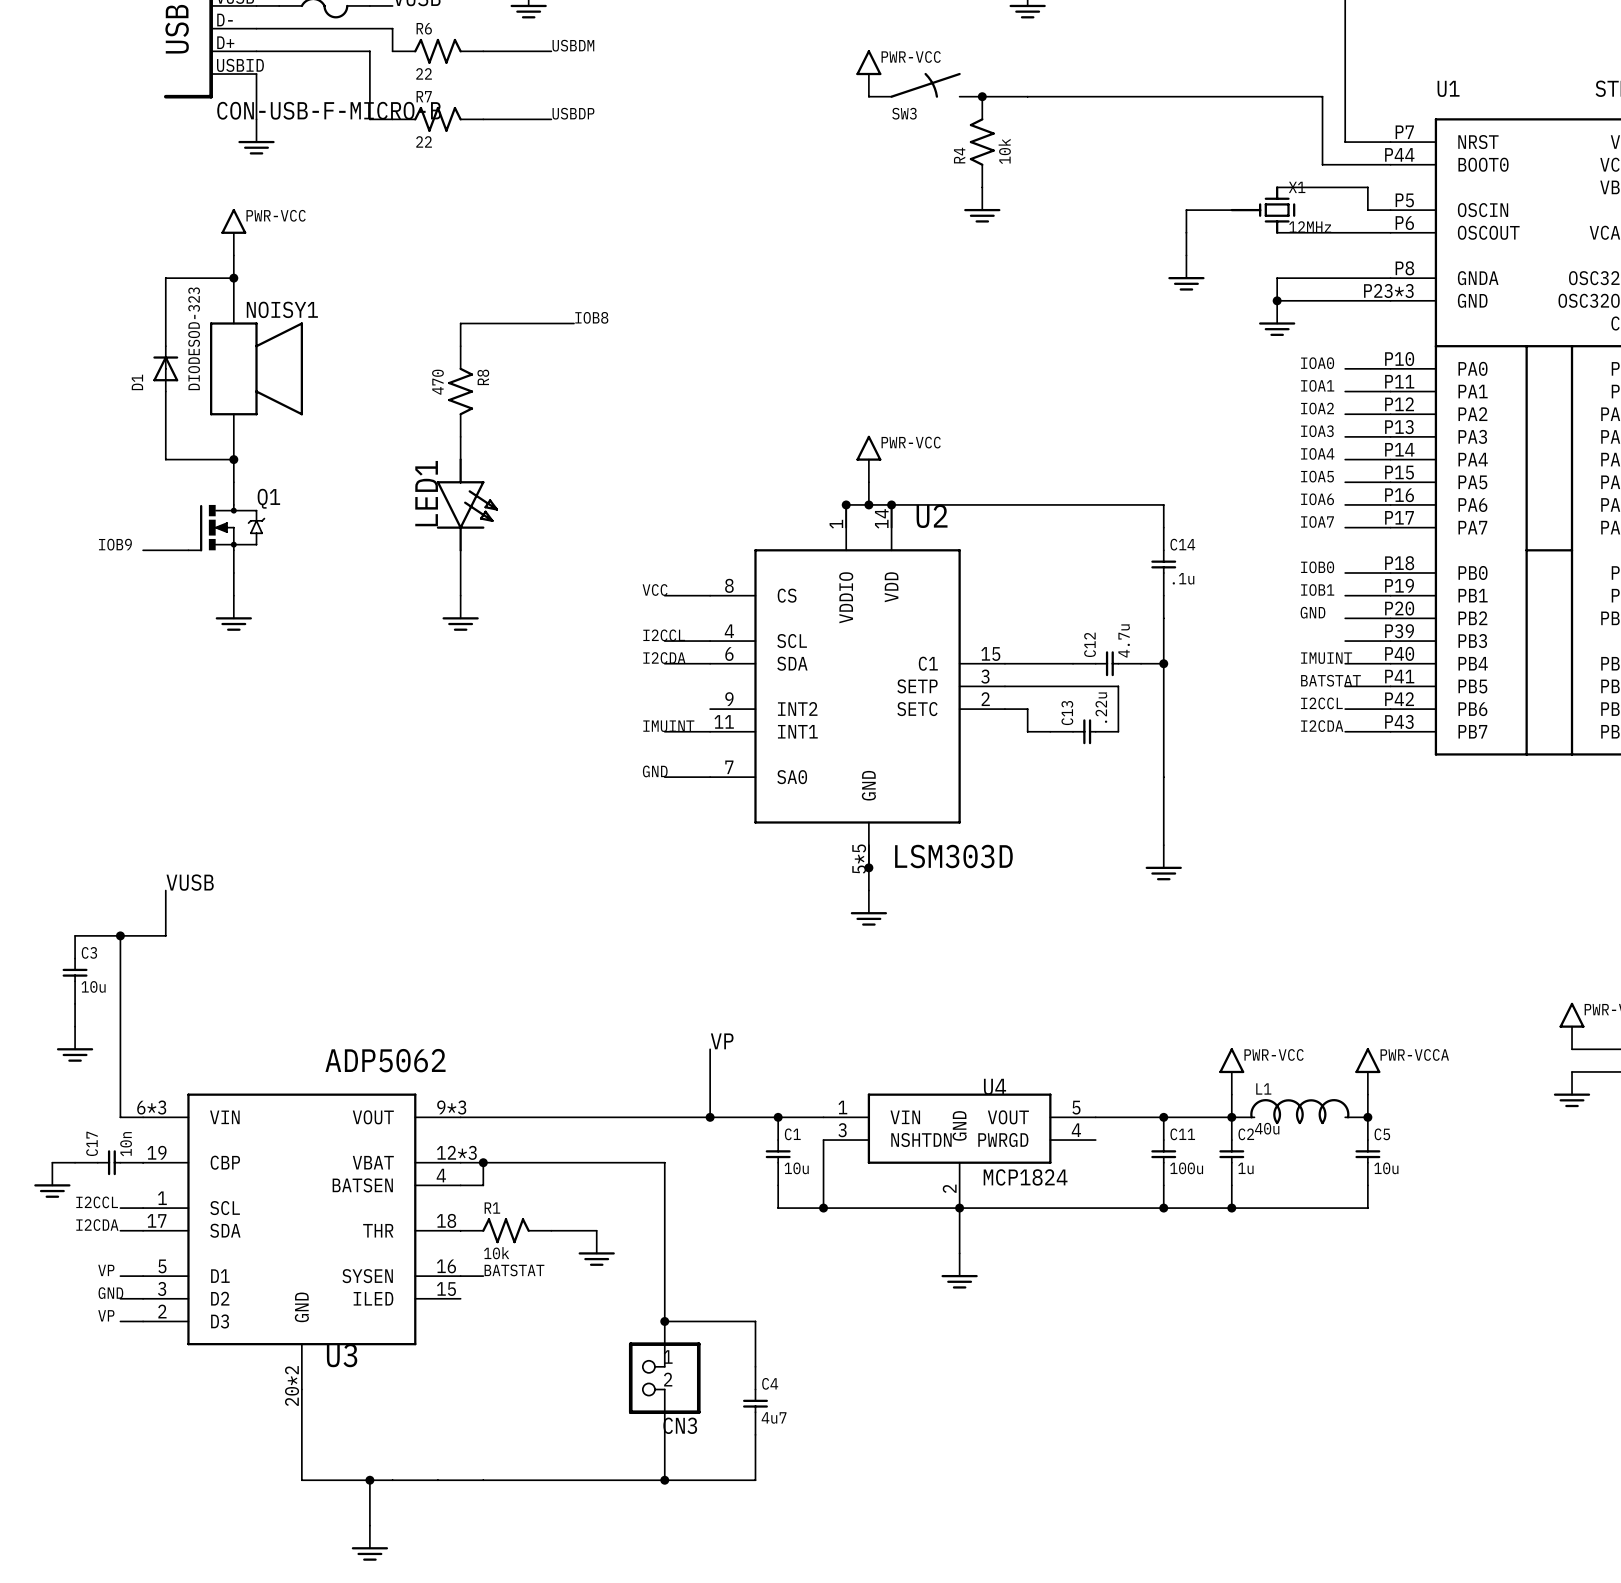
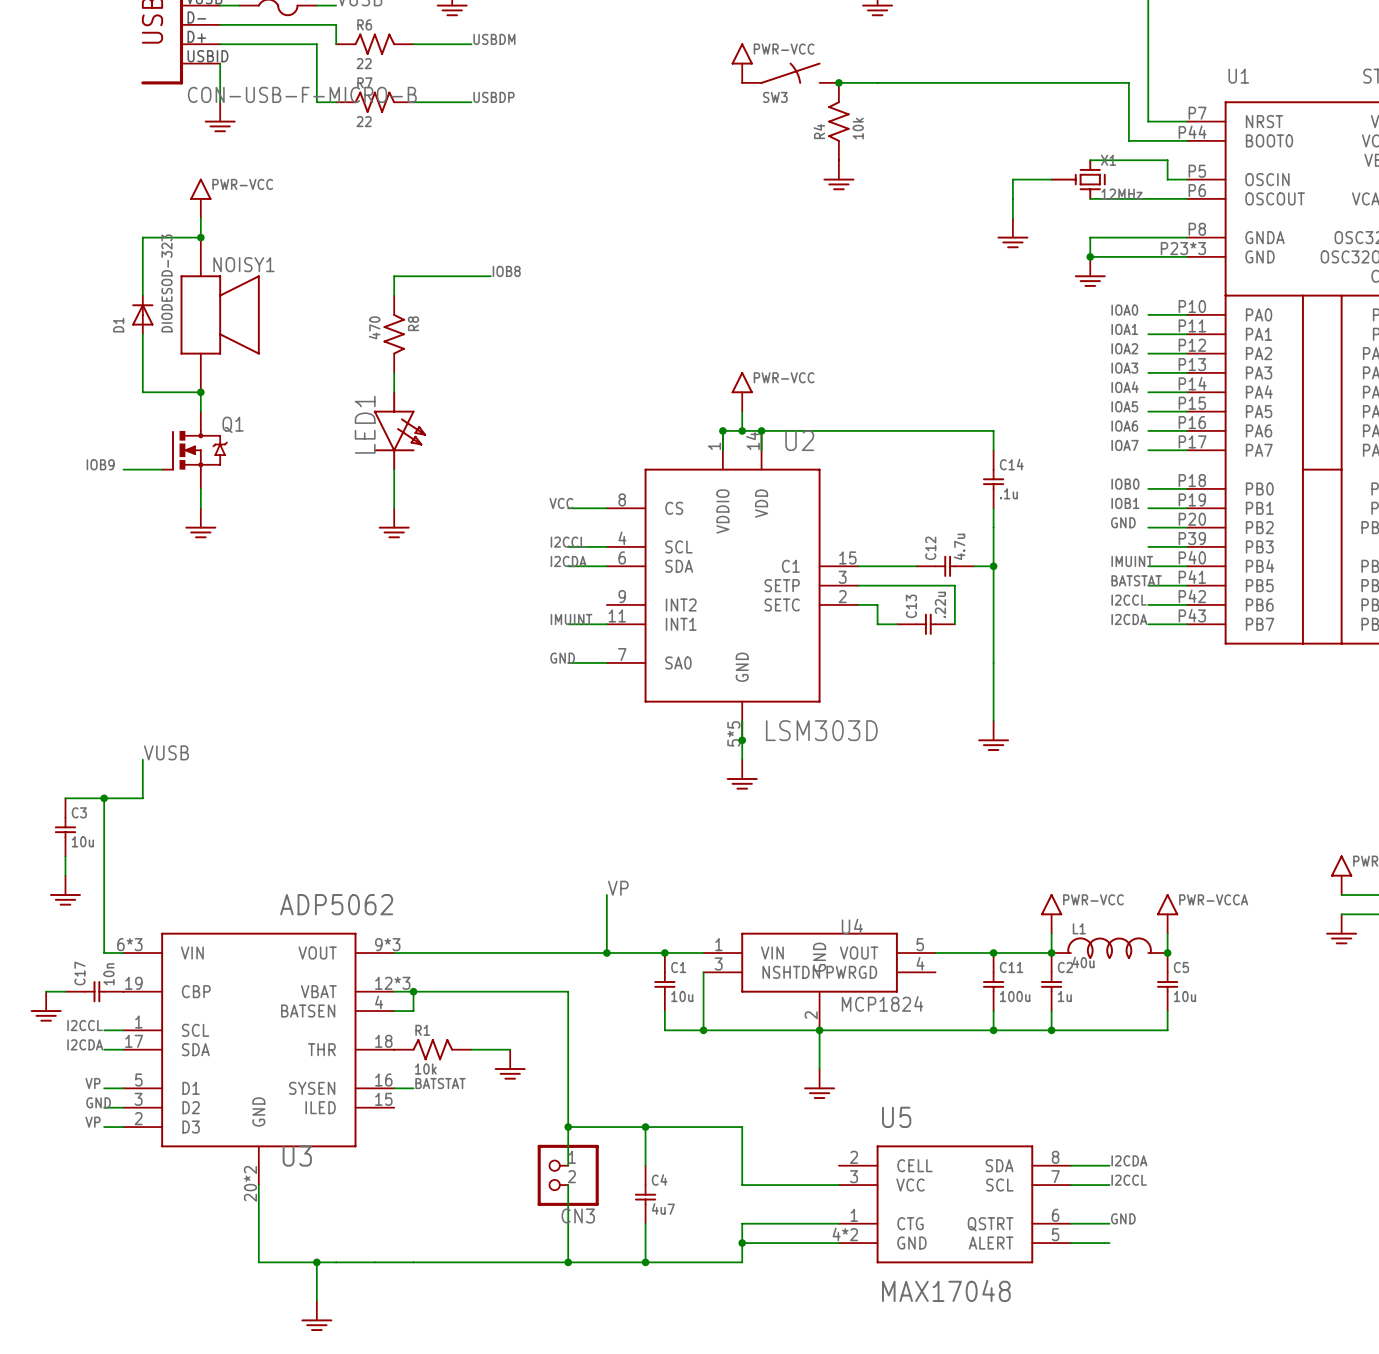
wire: none -> (645, 1127) (742, 1127) (742, 1185) (838, 1185)
junction: none -> (645, 1127)
label: none -> I2CDA (1129, 1160)
wire: none -> (1070, 1165) (1109, 1165)
label: none -> I2CCL (1129, 1180)
wire: none -> (1070, 1185) (1109, 1185)
U5: none -> MAX17048 (954, 1204)
label: none -> GND (1123, 1218)
wire: none -> (838, 1223) (742, 1223) (742, 1262) (645, 1262)
wire: none -> (1070, 1223) (1109, 1223)
wire: none -> (742, 1243) (838, 1243)
junction: none -> (742, 1243)
wire: none -> (1070, 1243) (1109, 1243)
junction: none -> (645, 1262)

